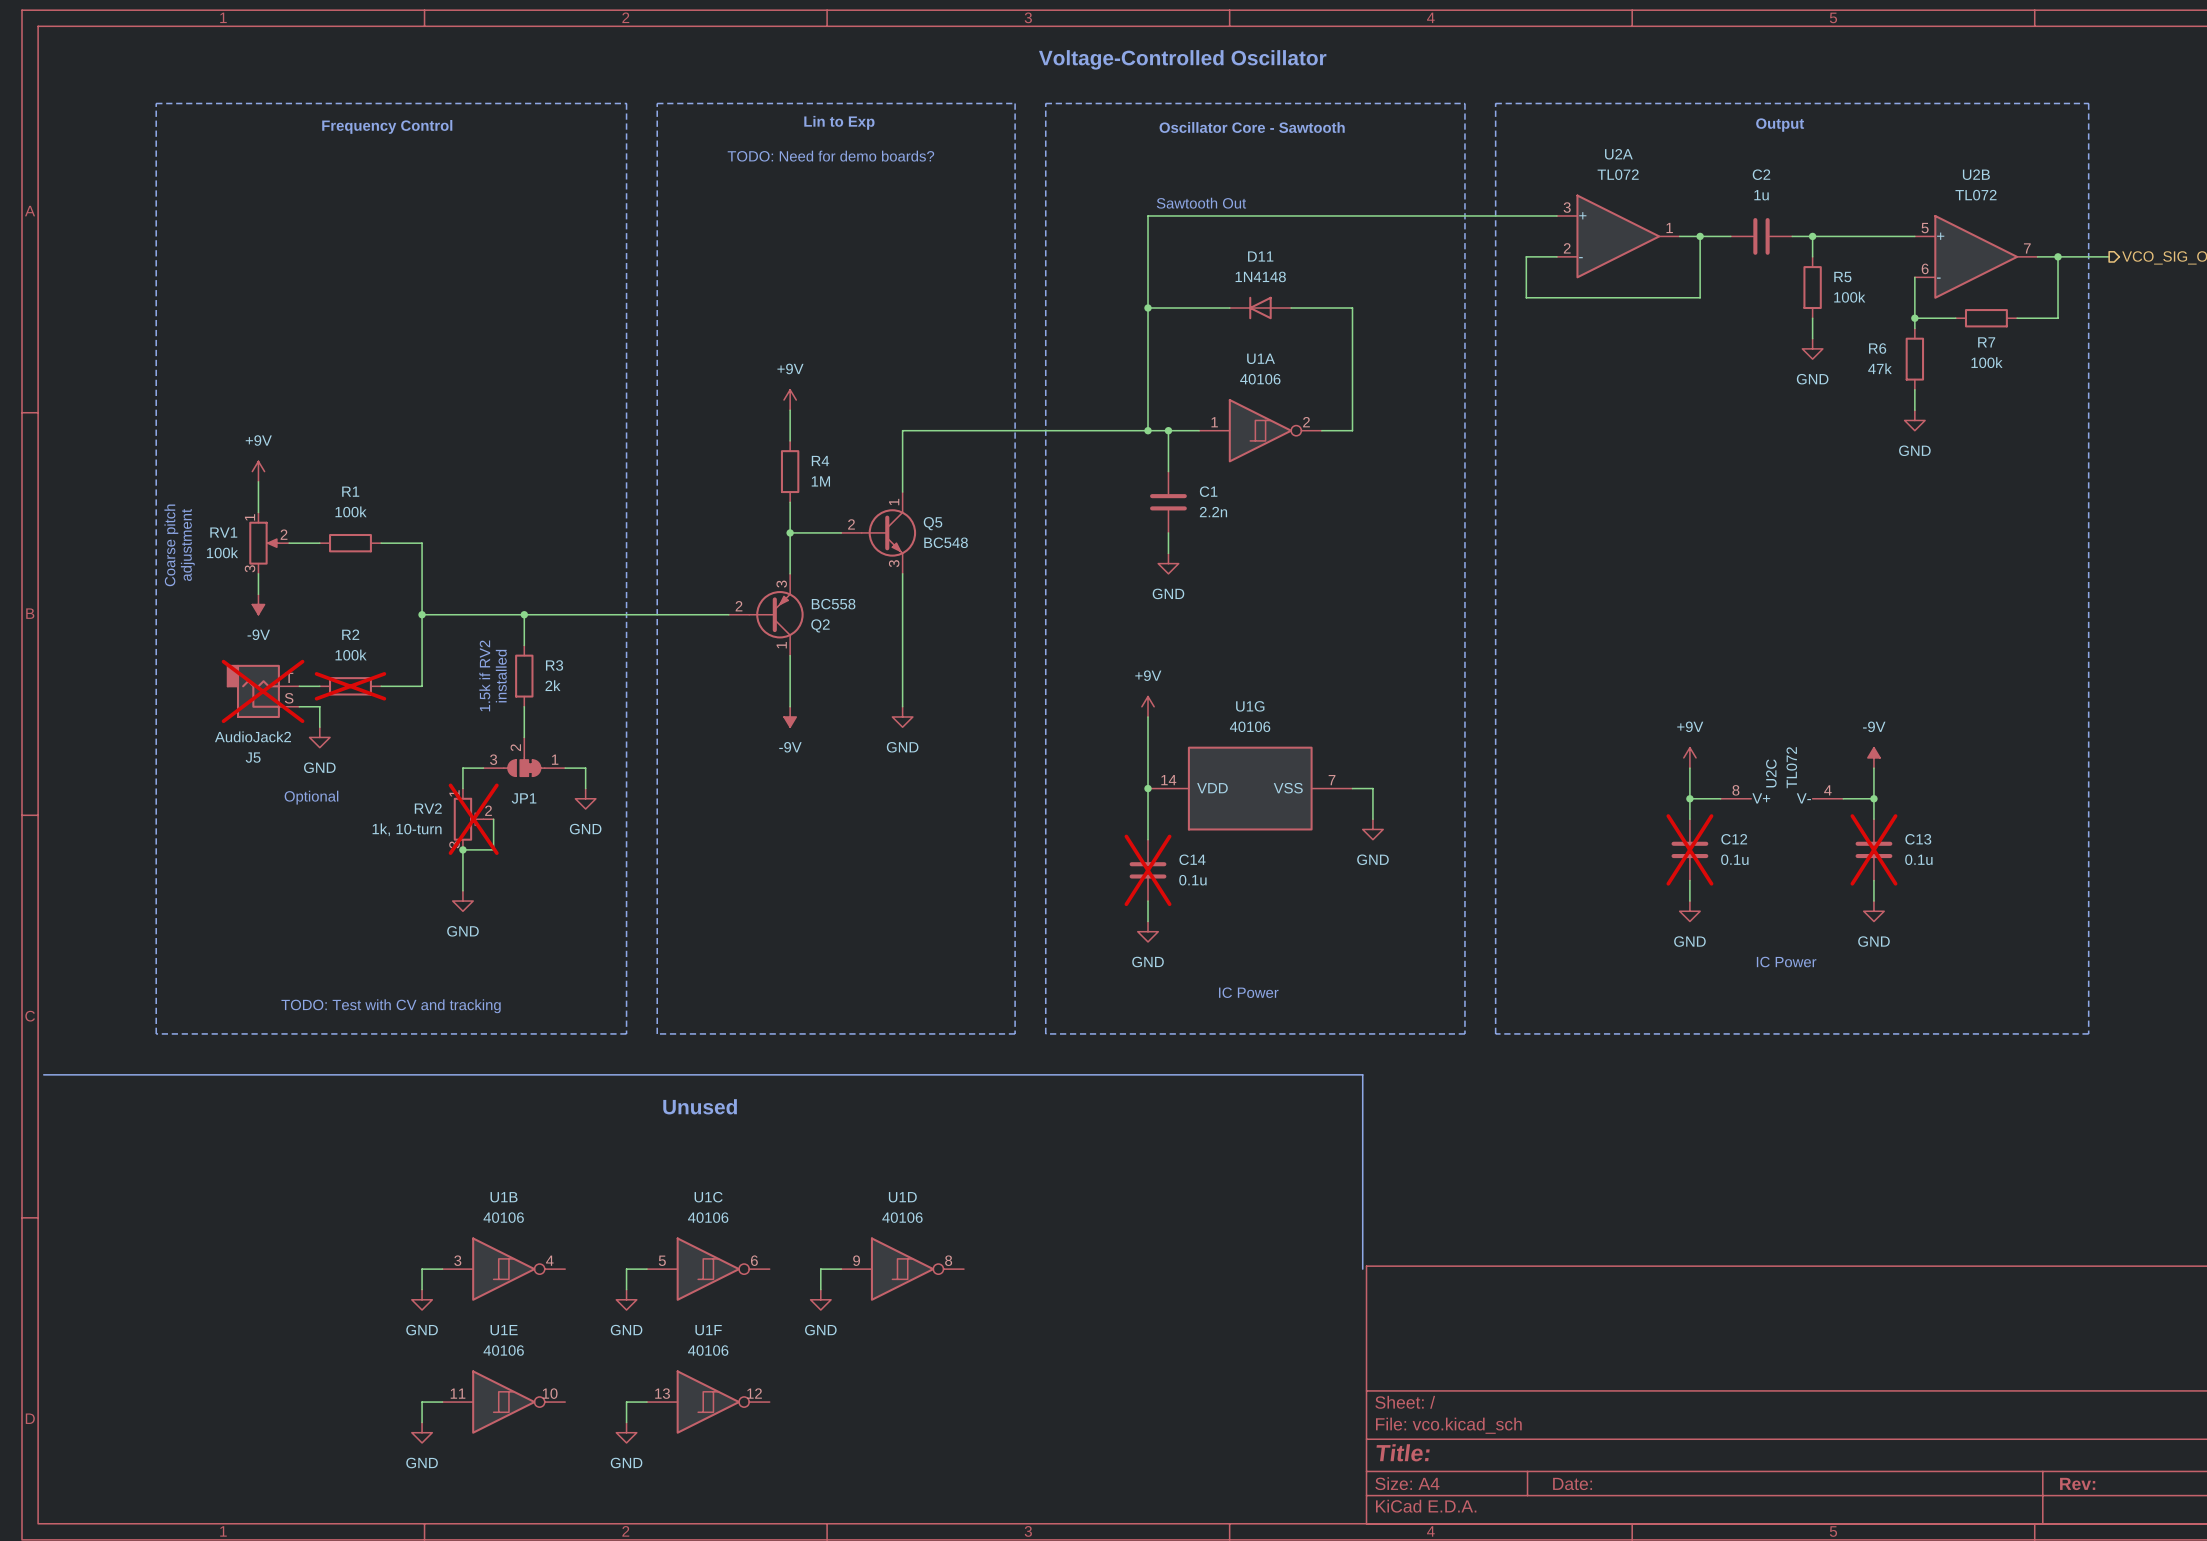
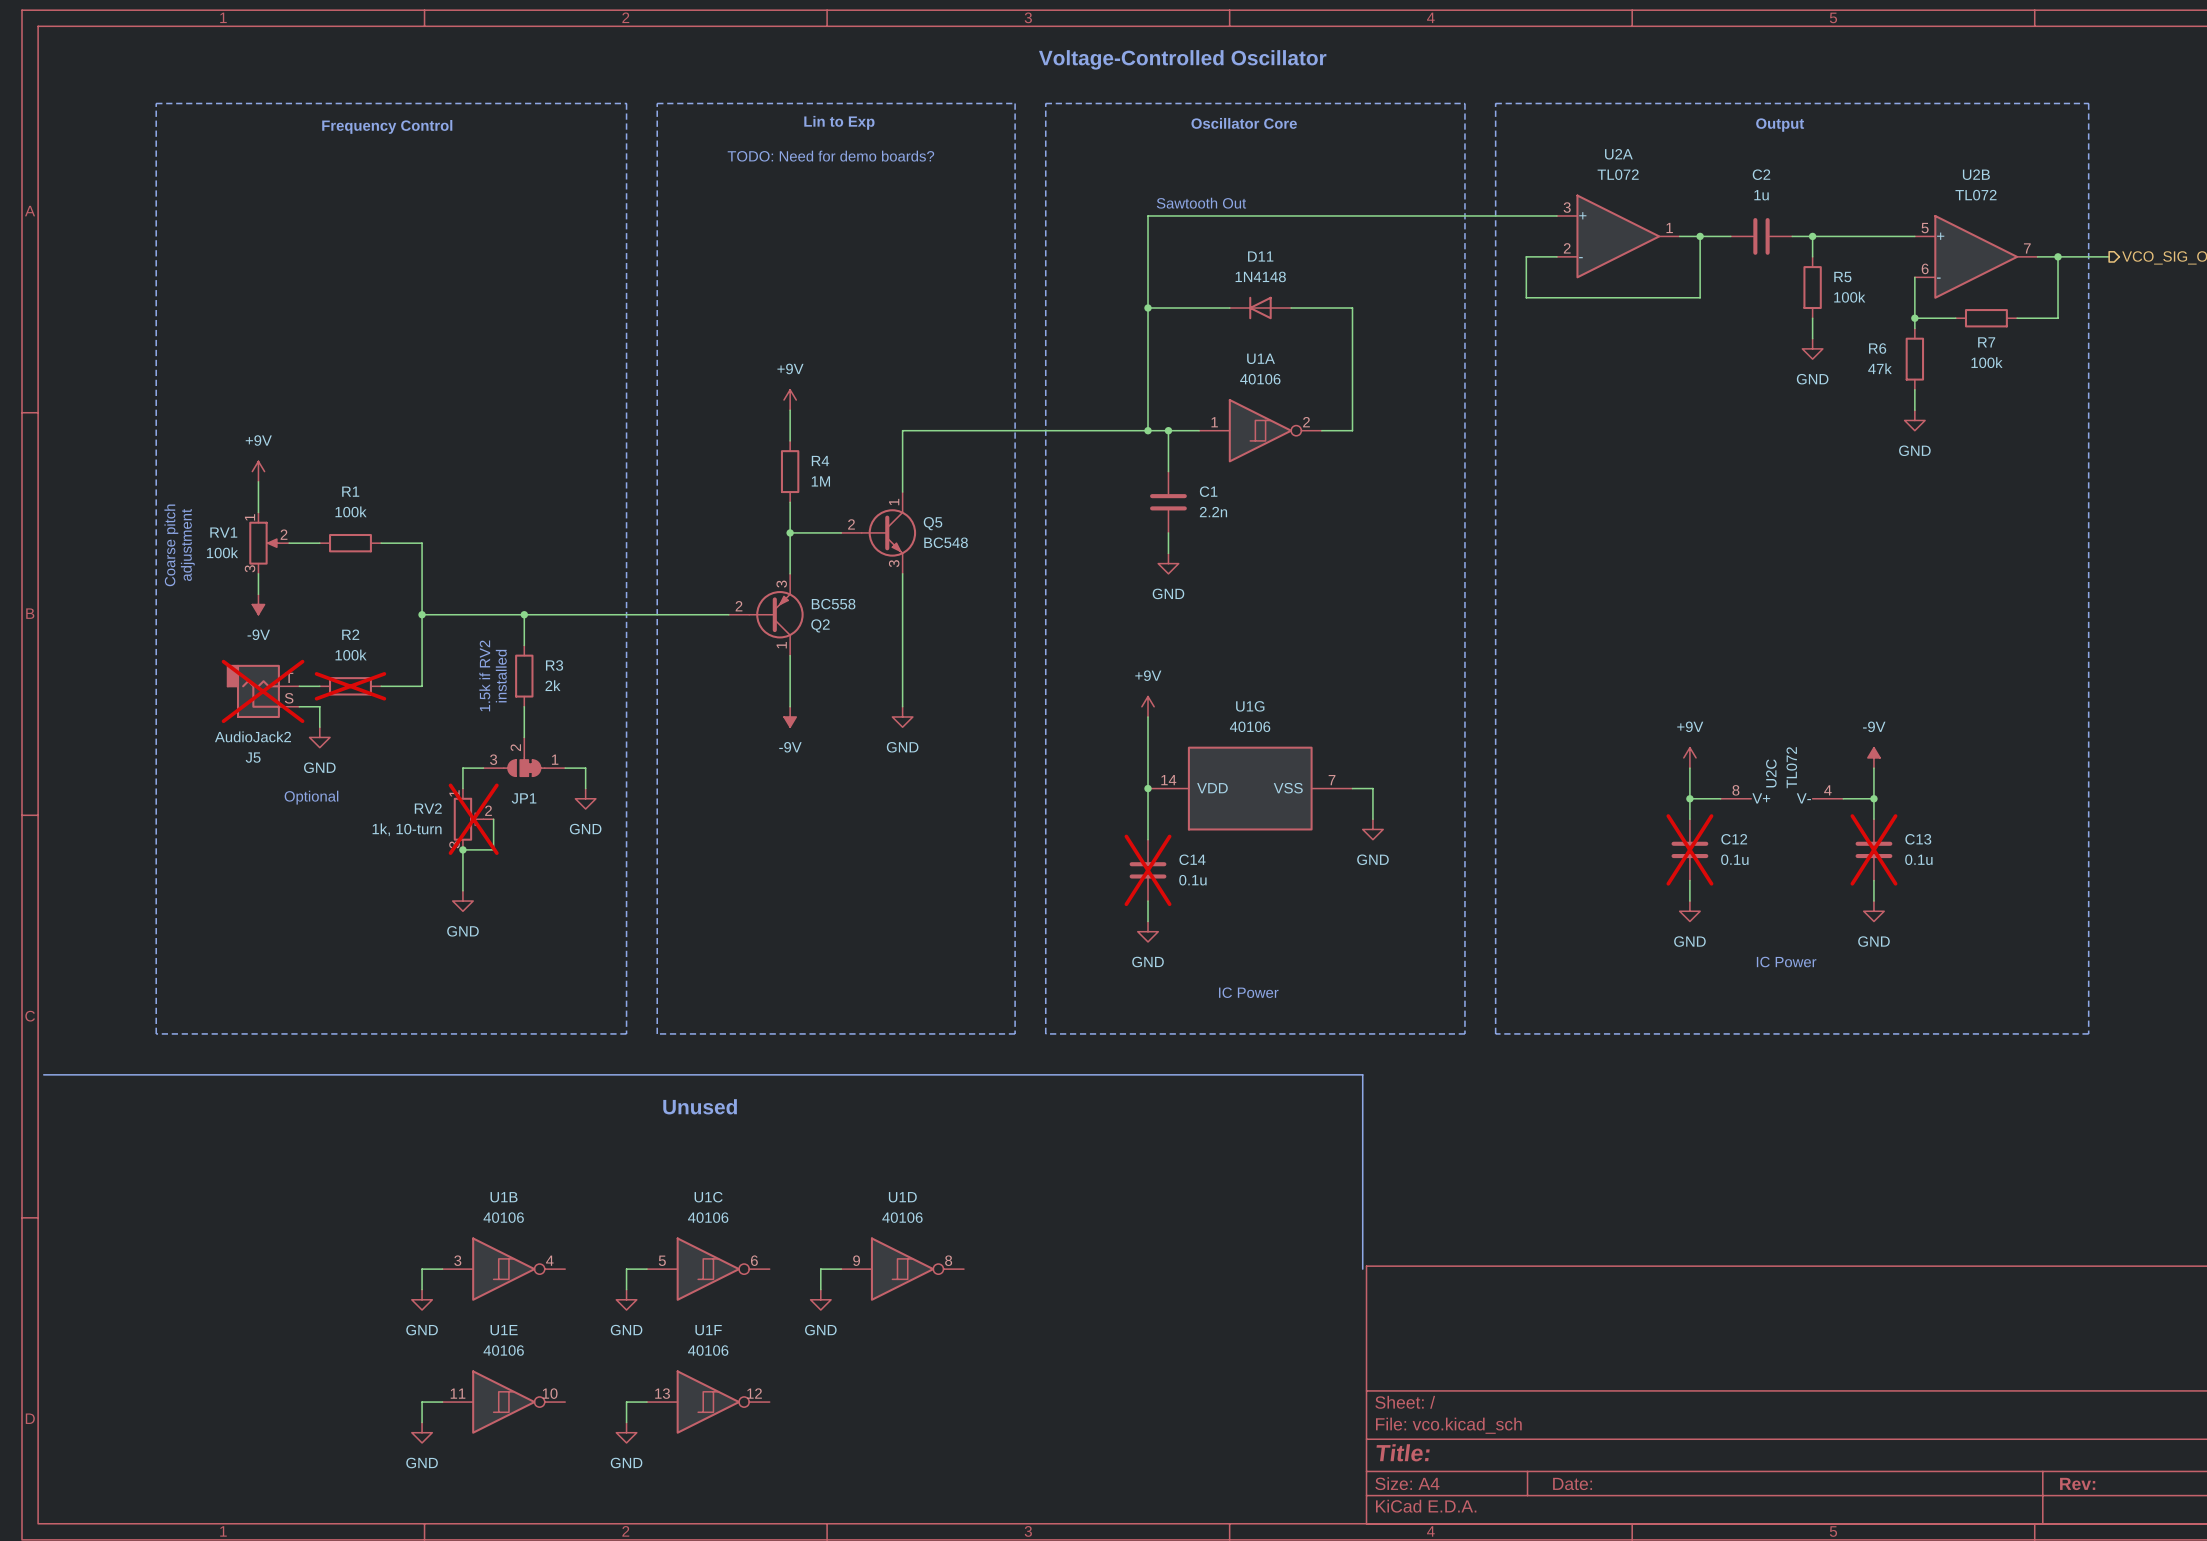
text: Oscillator Core - Sawtooth (1252, 127) -> Oscillator Core (1244, 123)
text: TODO: Test with CV and tracking (391, 1006) -> none

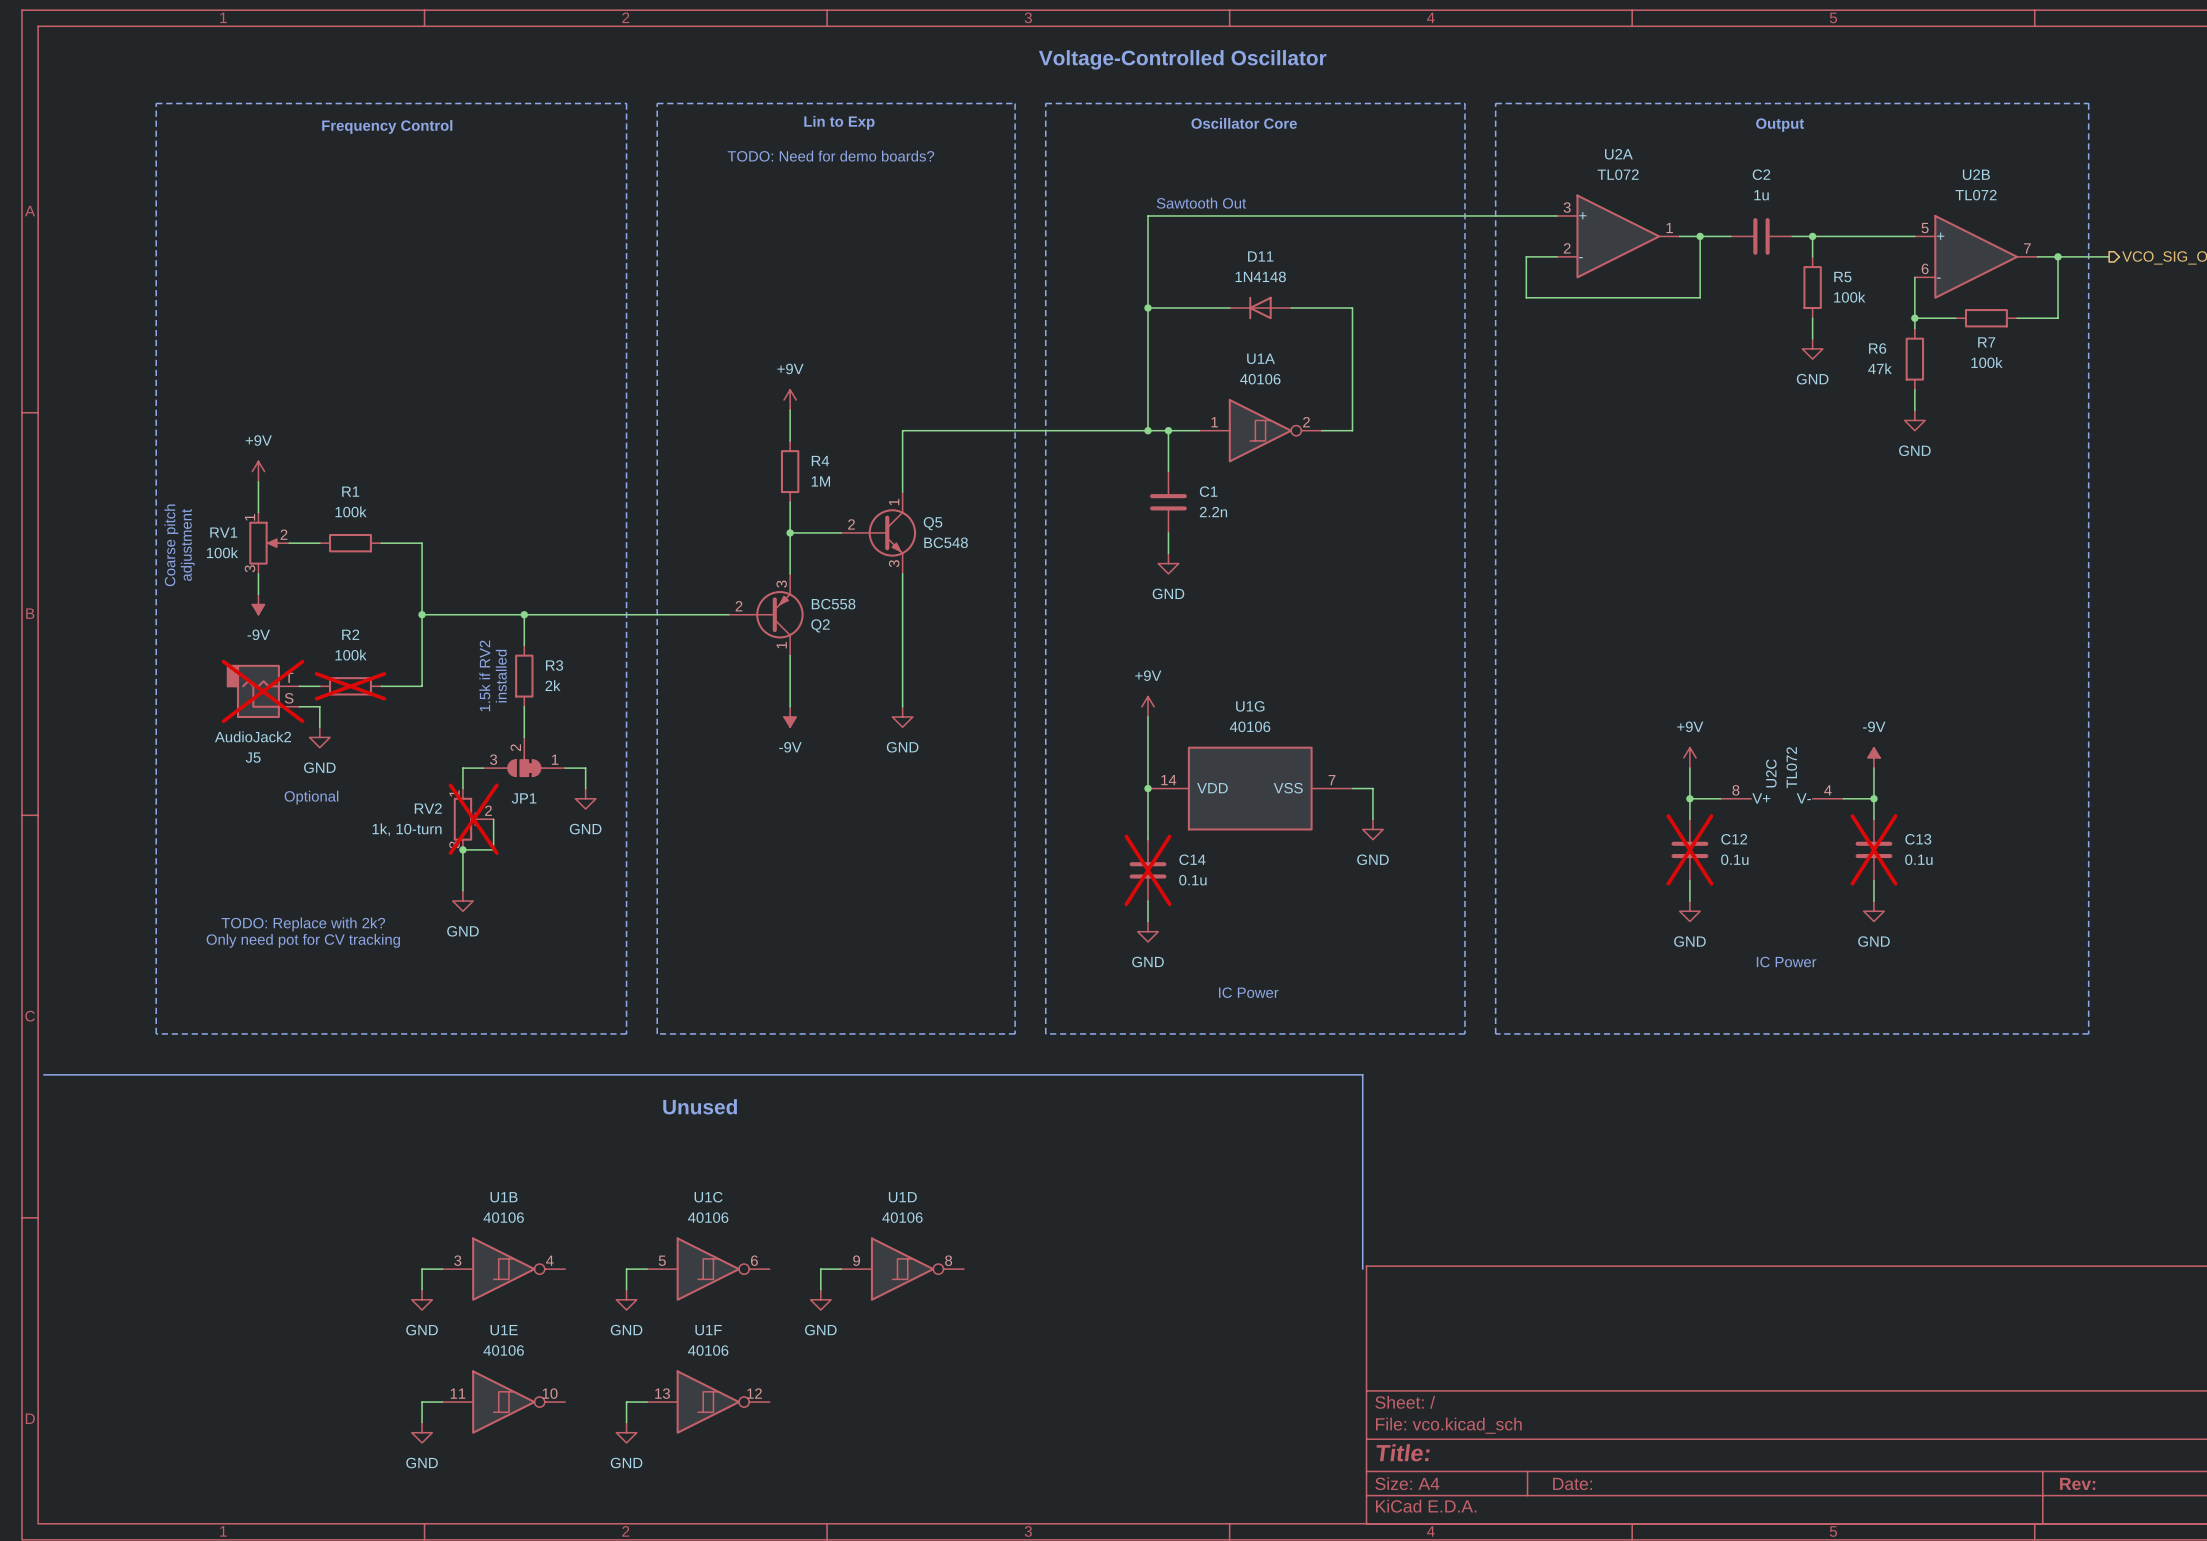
text: none -> TODO: Replace with 2k? (303, 924)
text: none -> Only need pot for CV tracking (303, 940)

